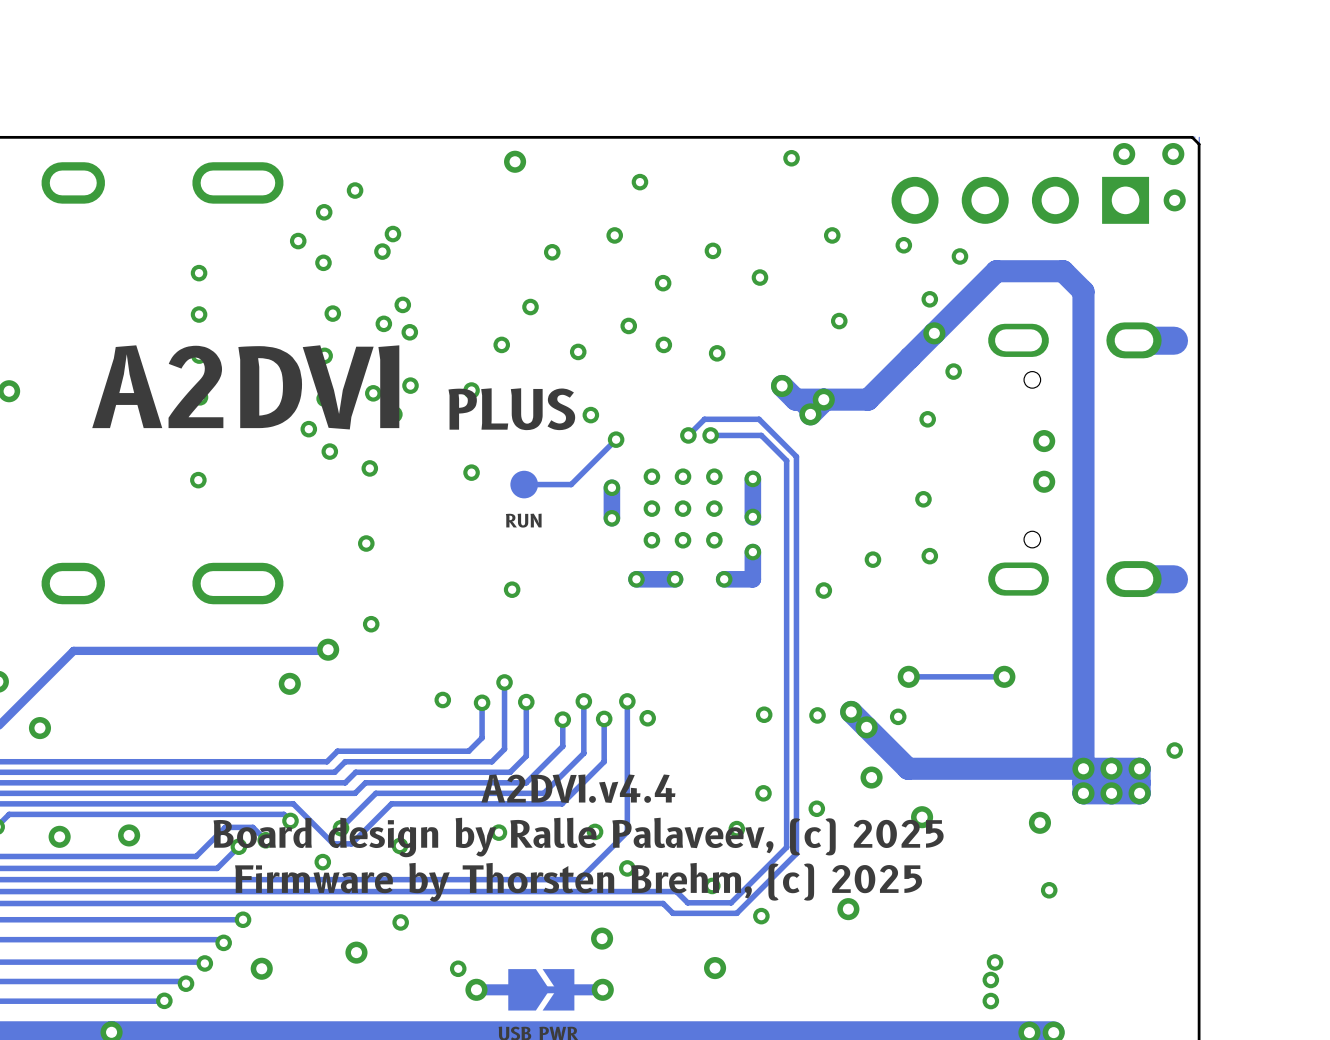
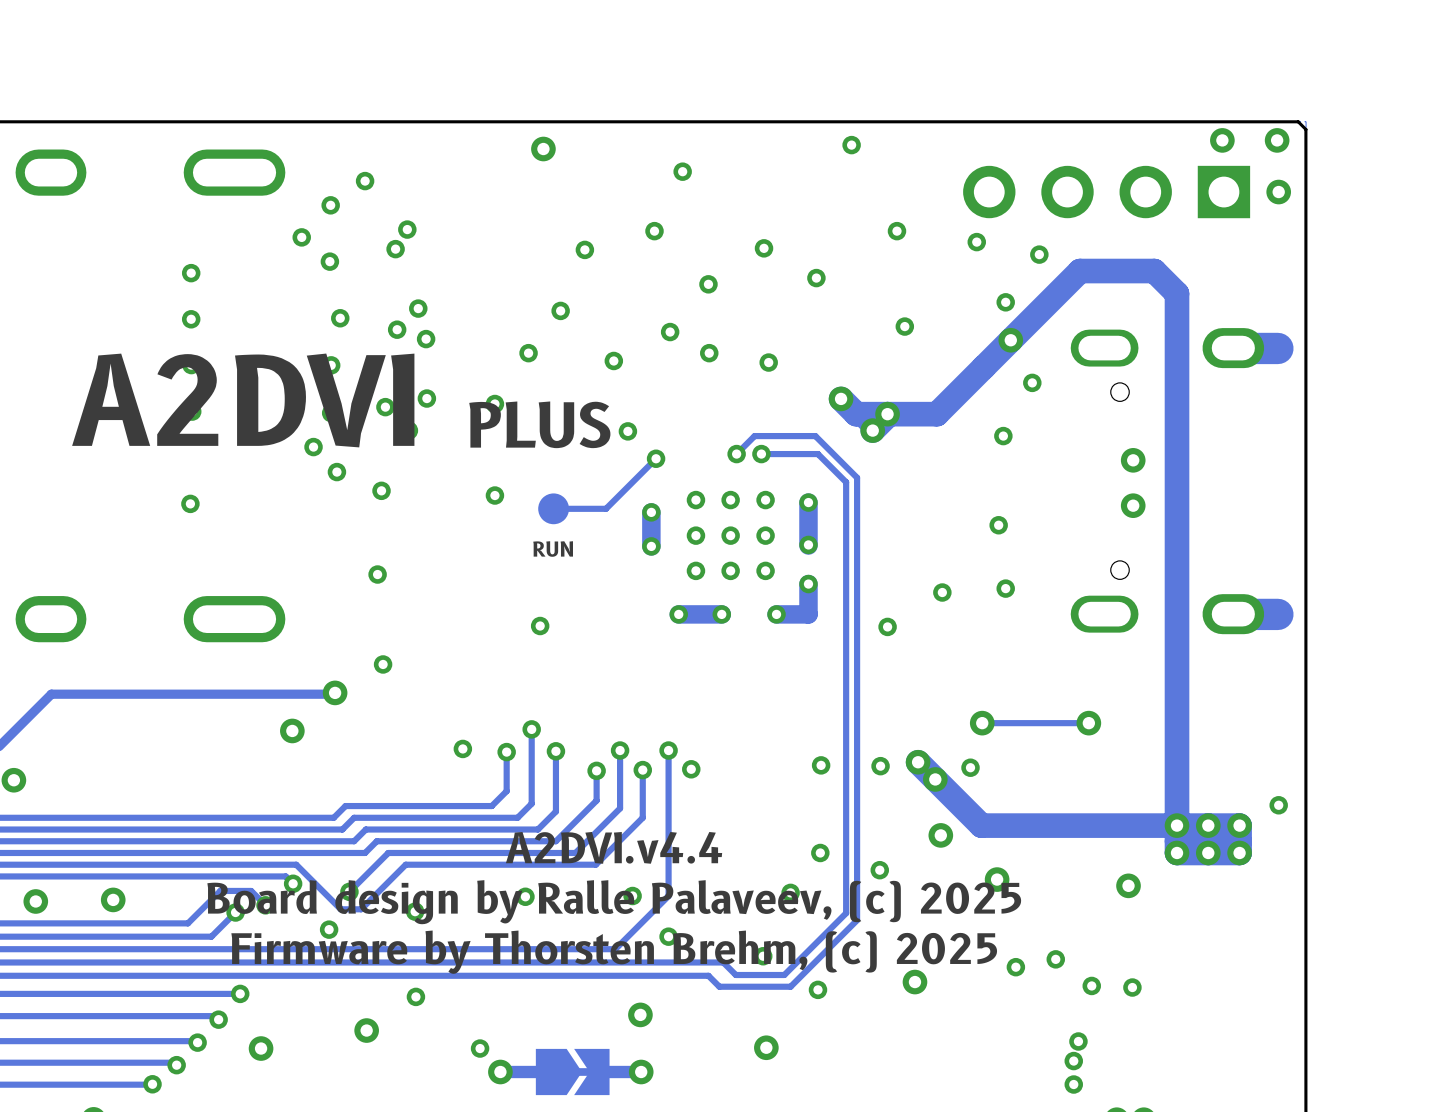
via: none -> (1055, 959)
via: (1049, 890) -> none
via: none -> (1015, 967)
via: none -> (1091, 985)
via: none -> (1132, 987)

